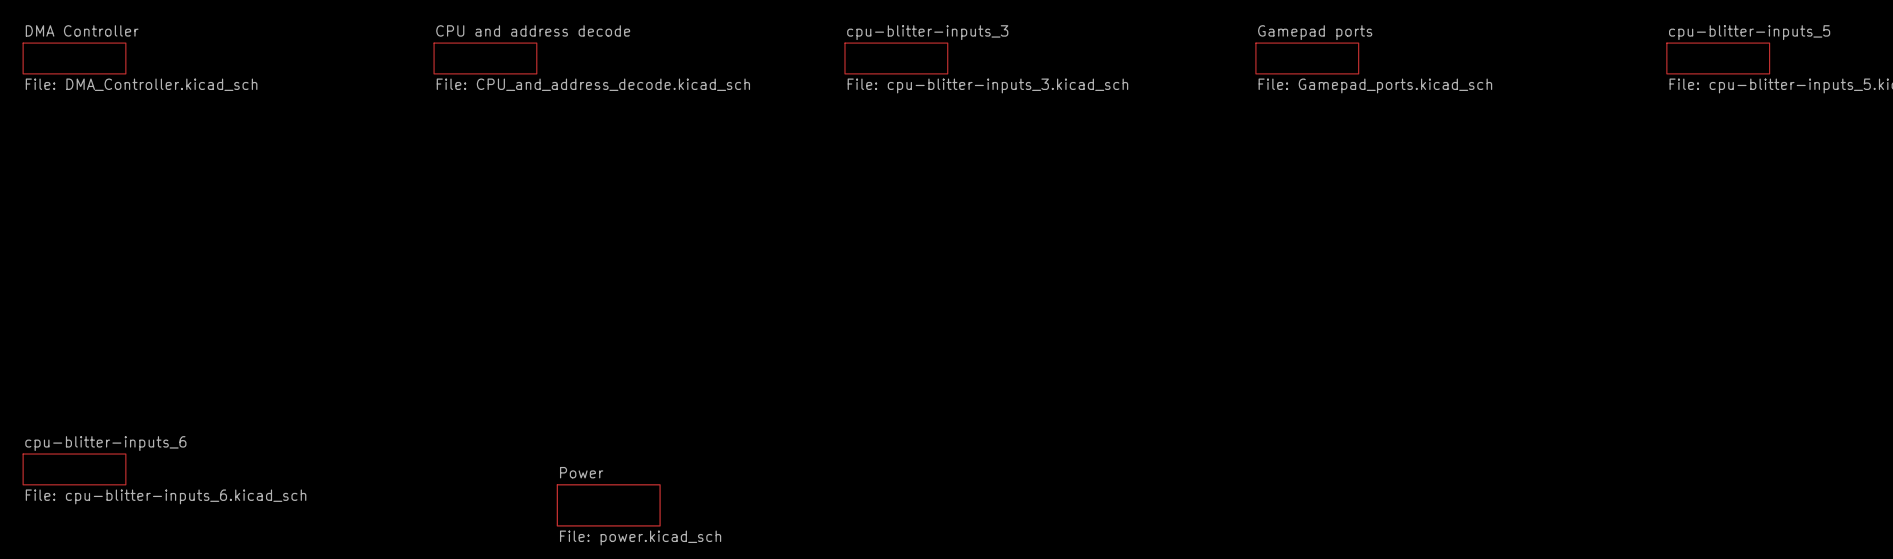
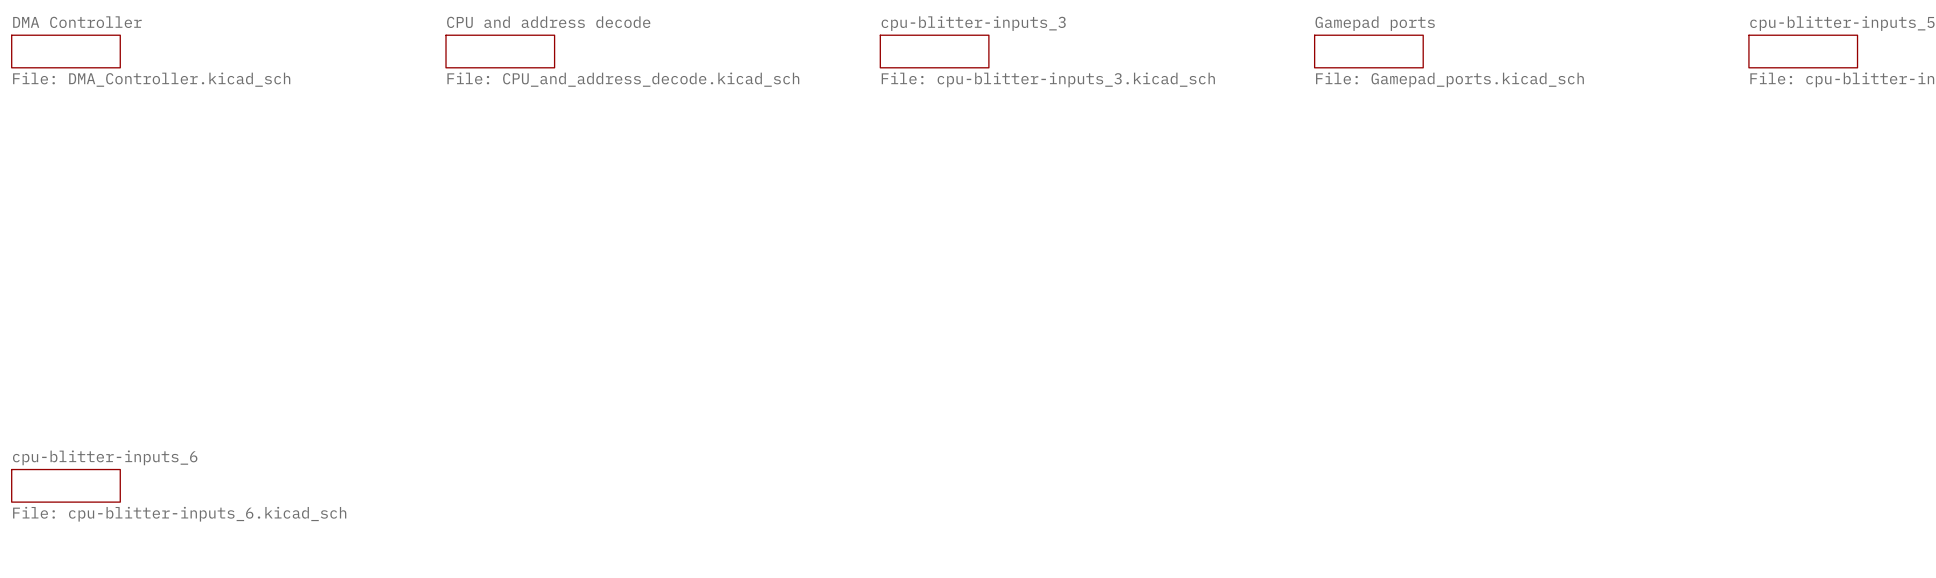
sheet Power: File: power.kicad_sch (608, 505) -> none

